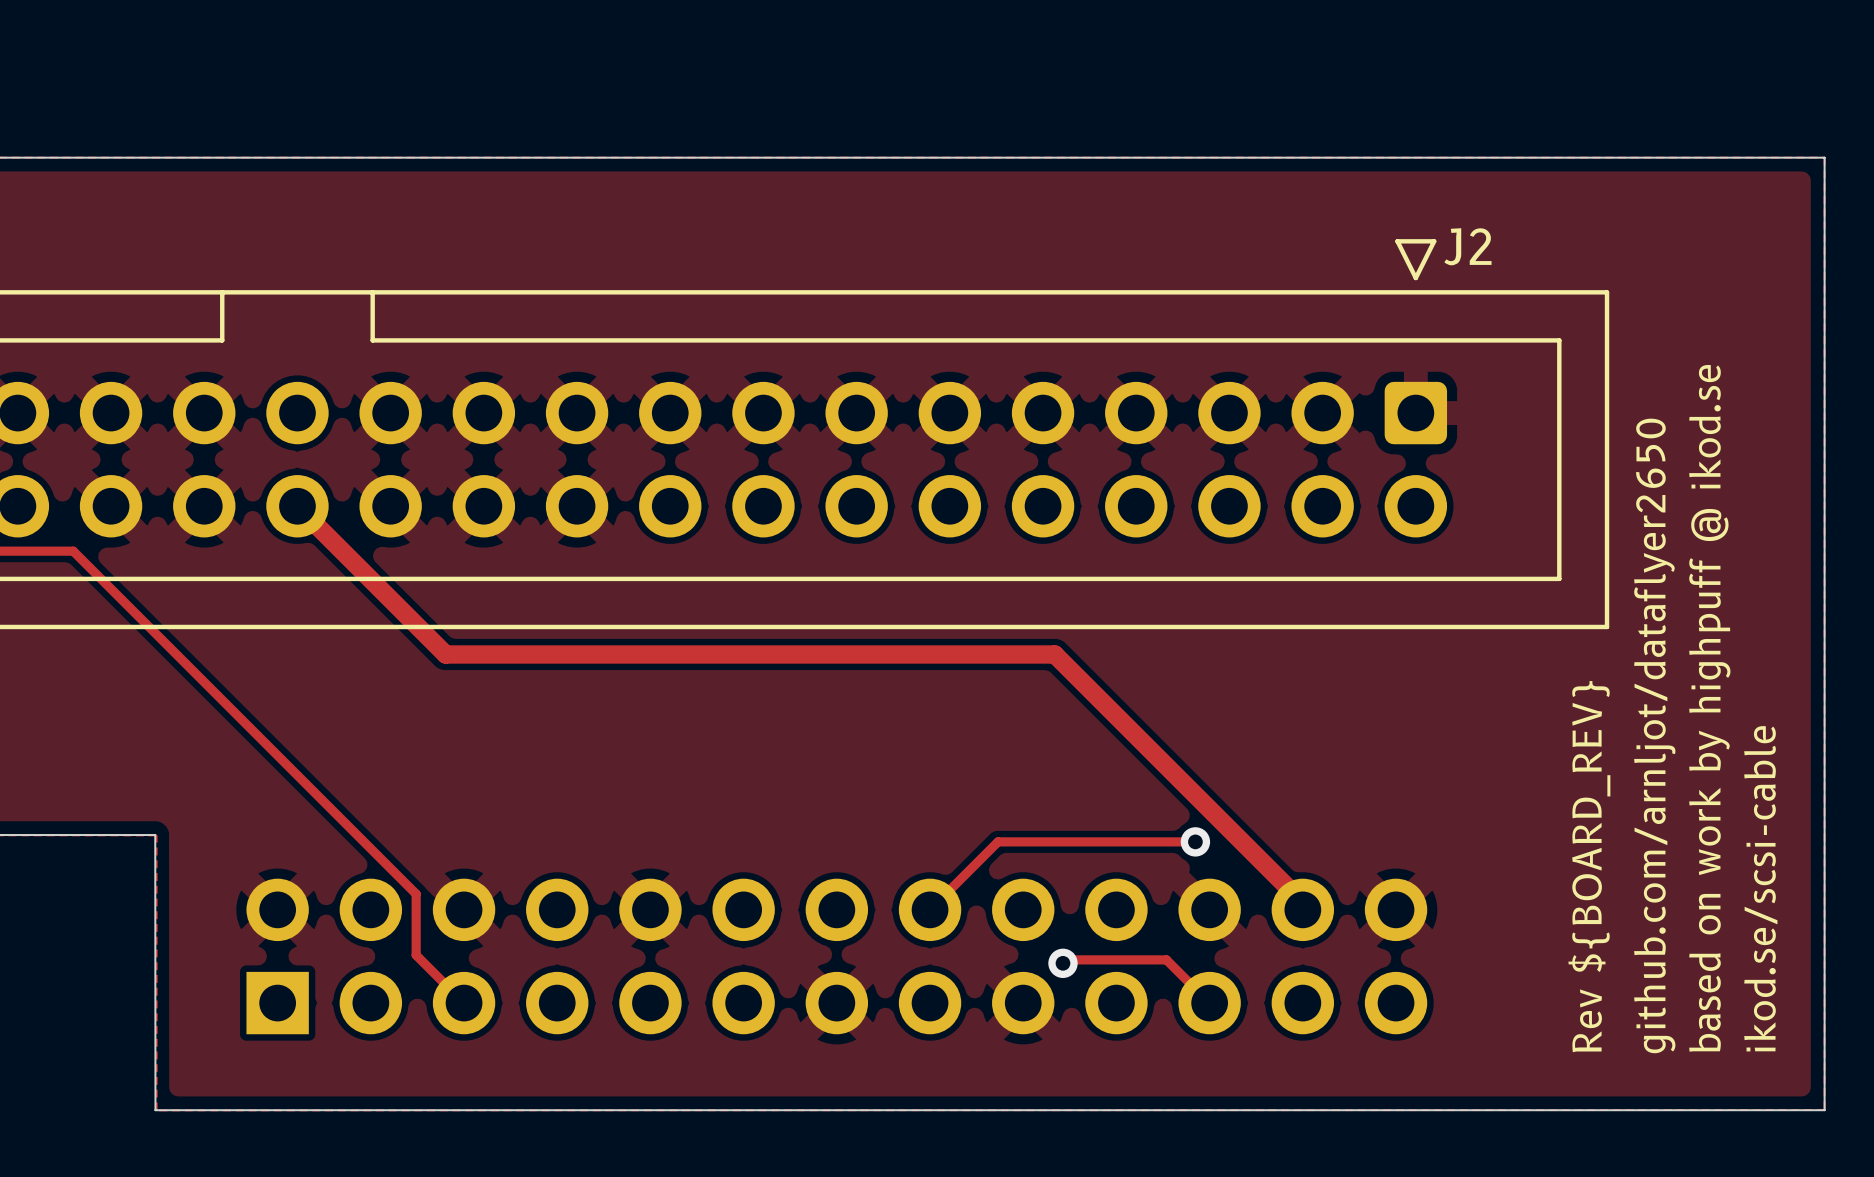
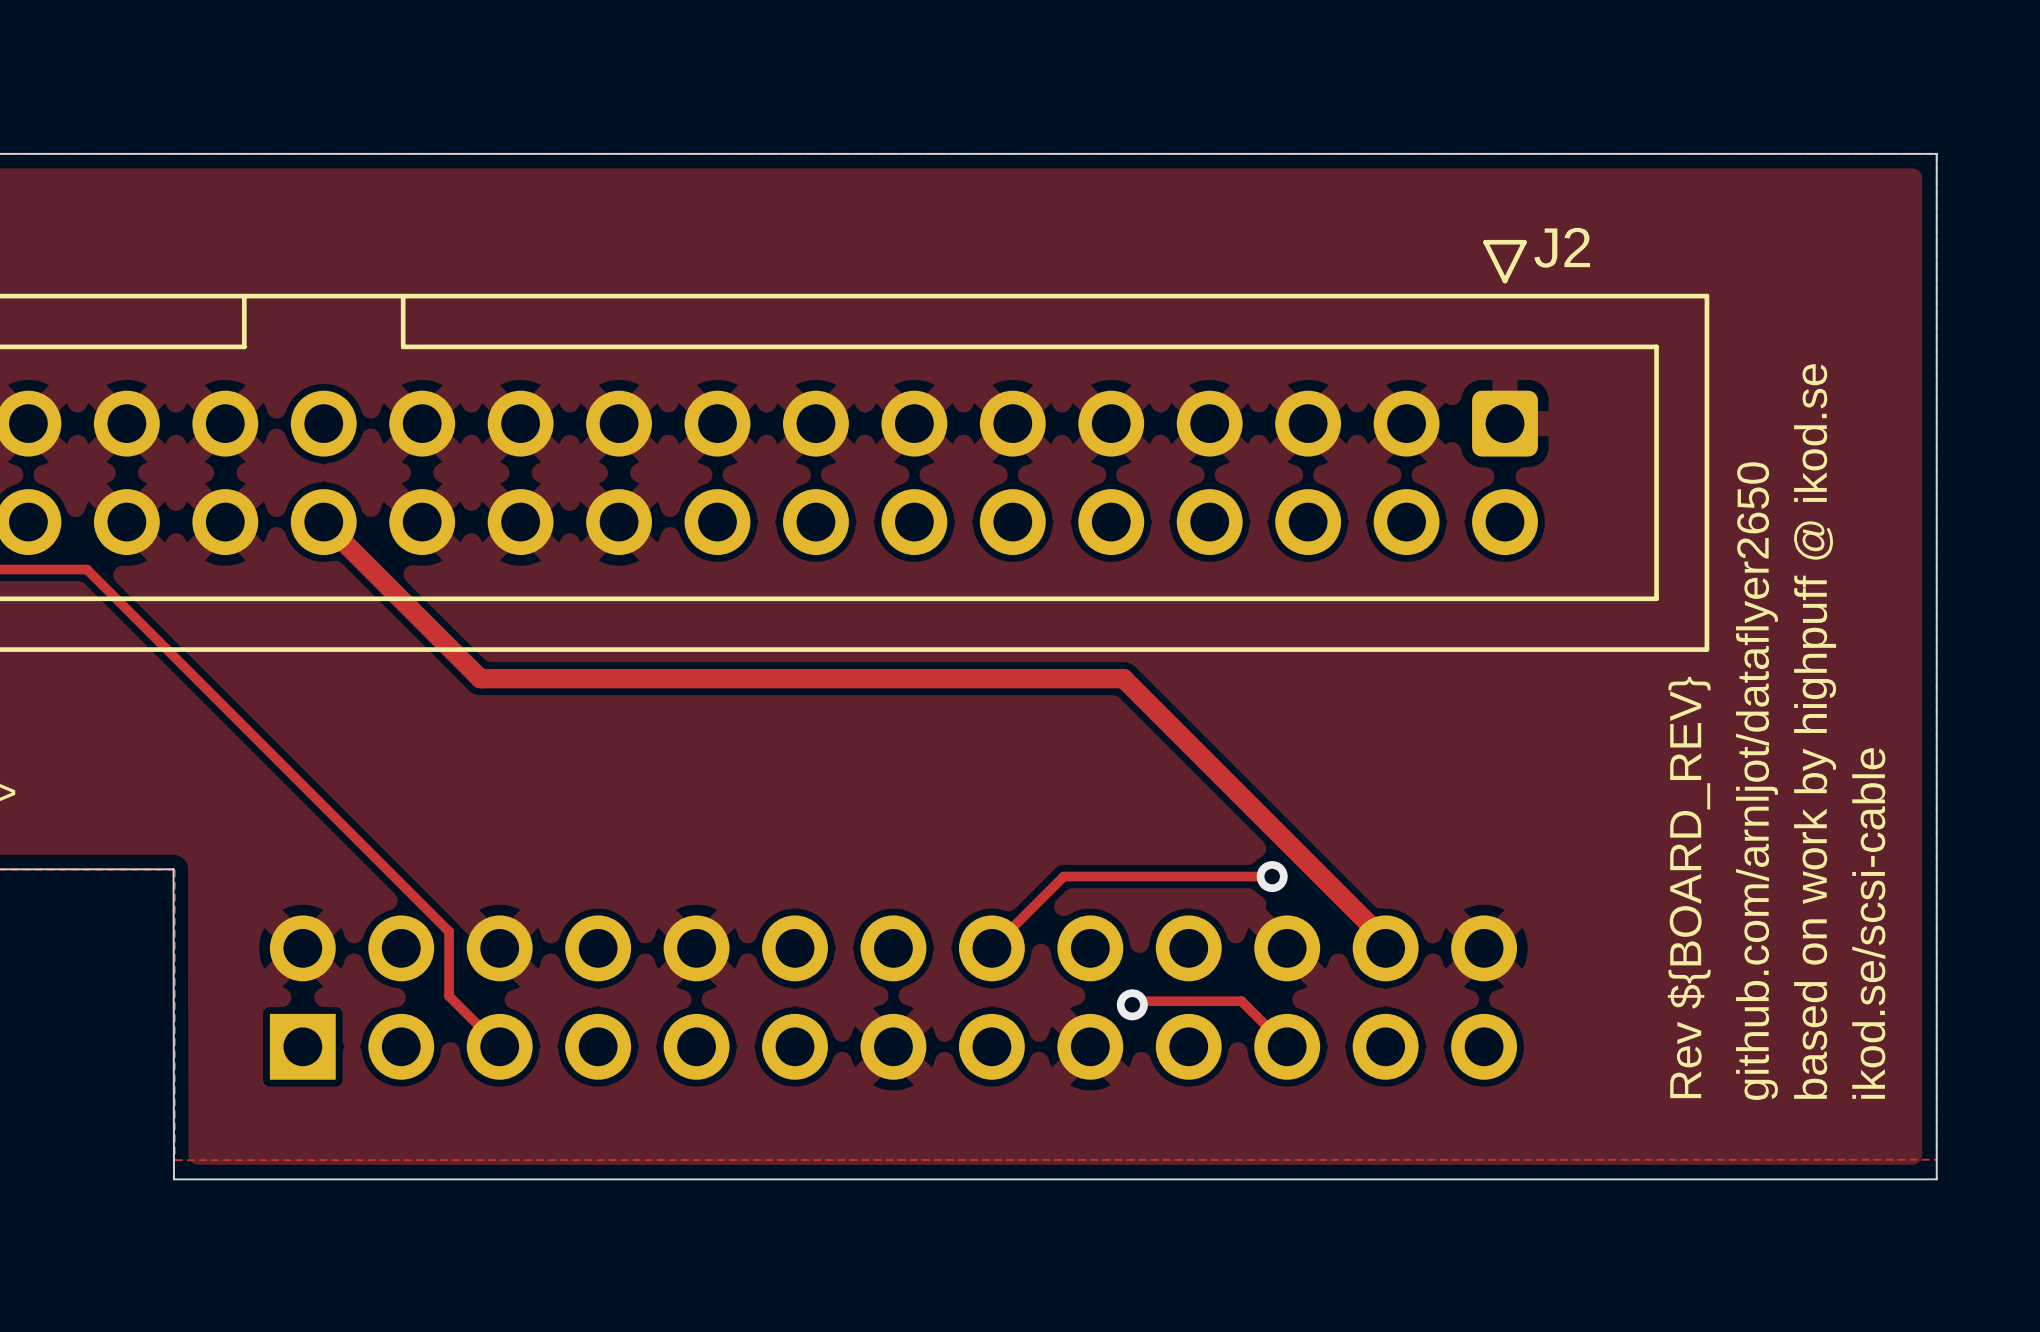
board edge: (155, 835) (155, 1110) (1824, 1110) -> (173, 869) (173, 1179) (1936, 1179)
board edge: none -> (1936, 1159) (1936, 1179)

